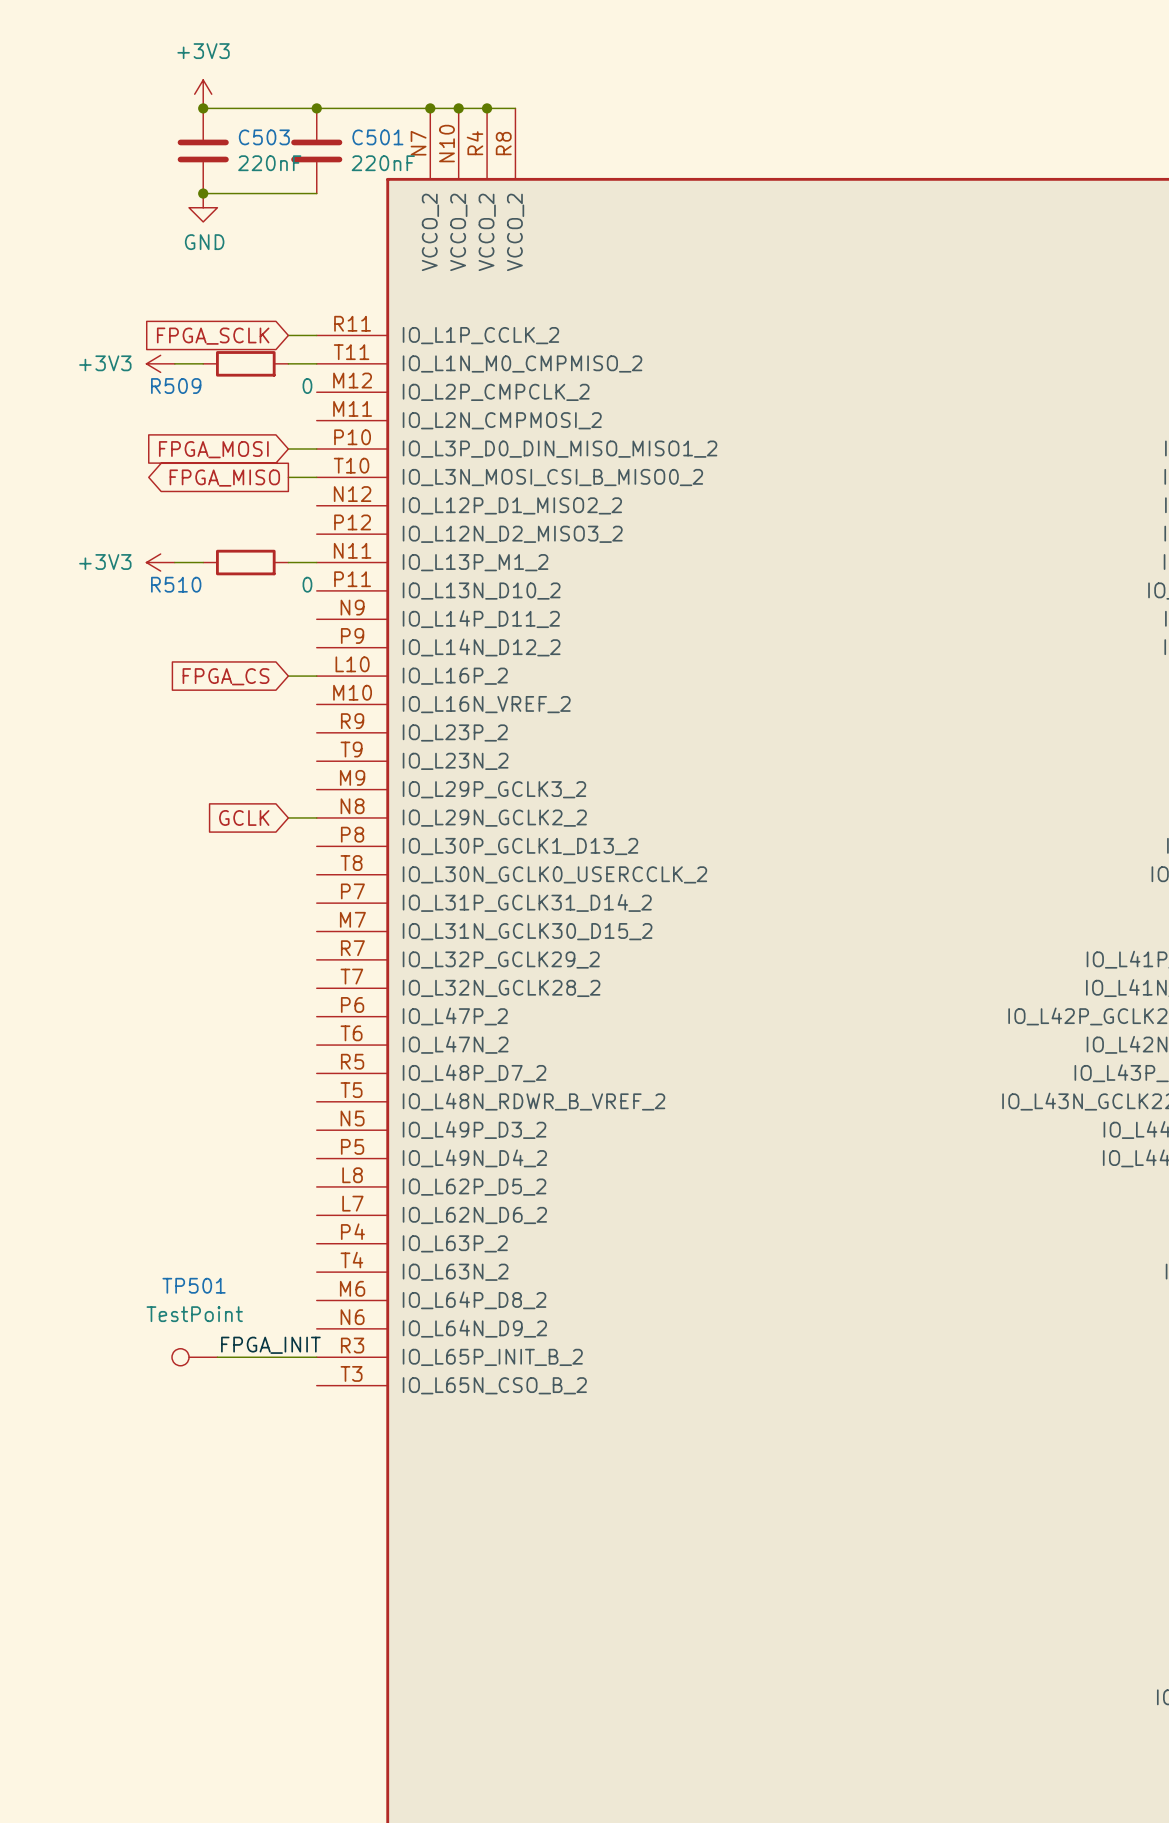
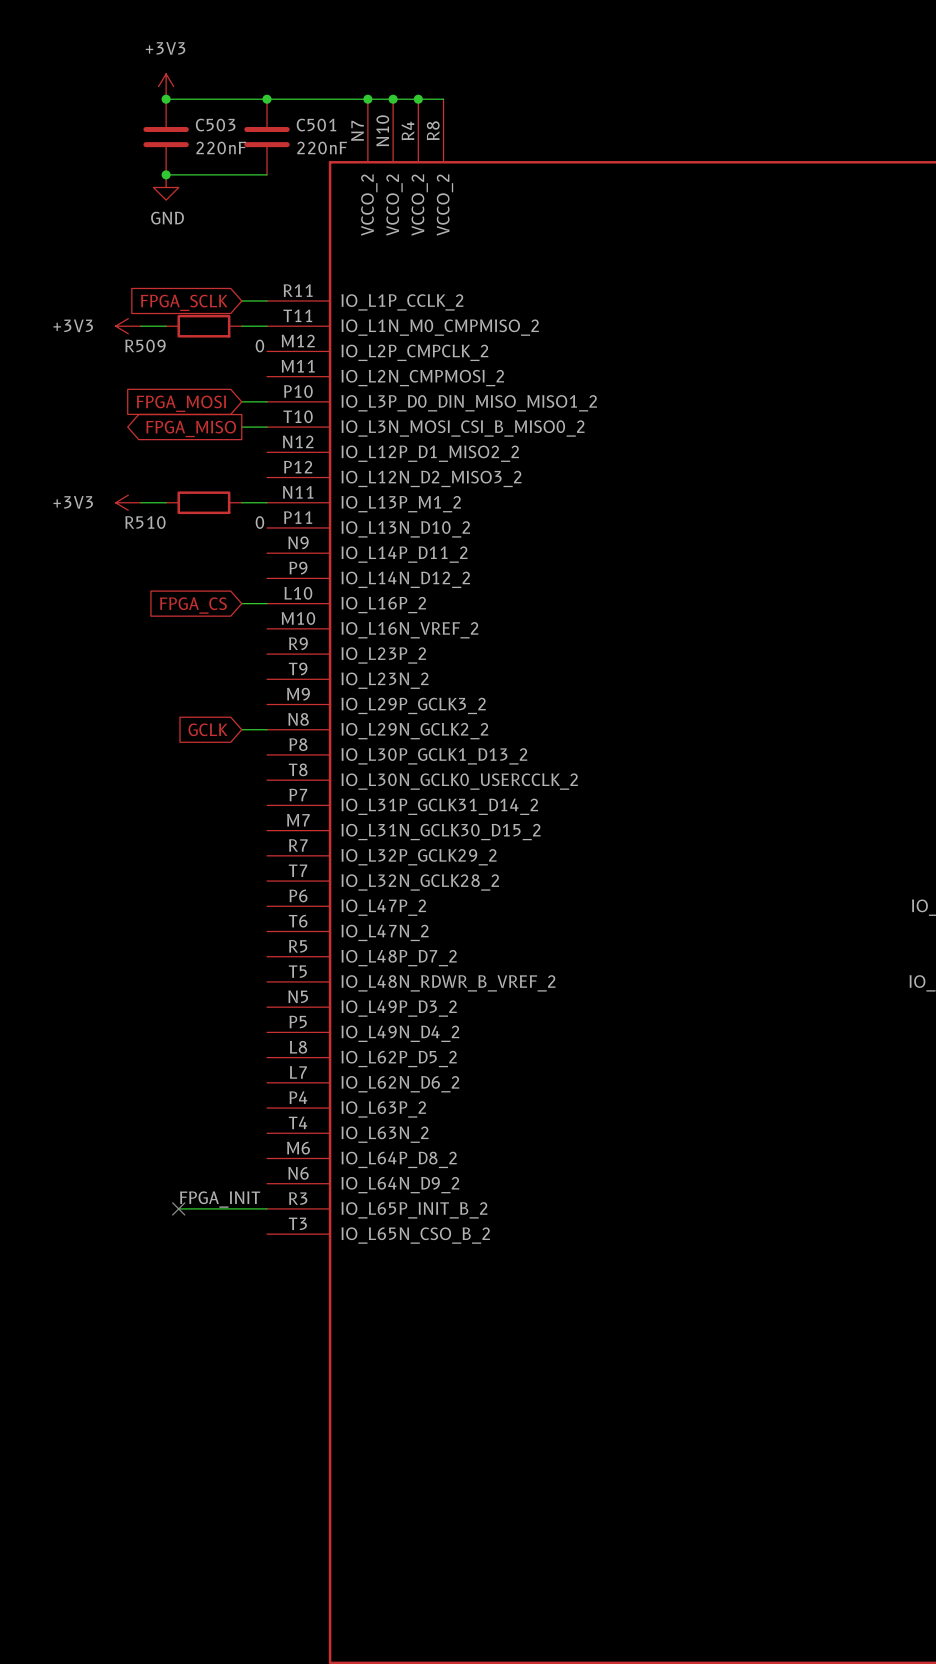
TP501: TestPoint (194, 1357) -> none
no-connect mark: none -> (178, 1208)

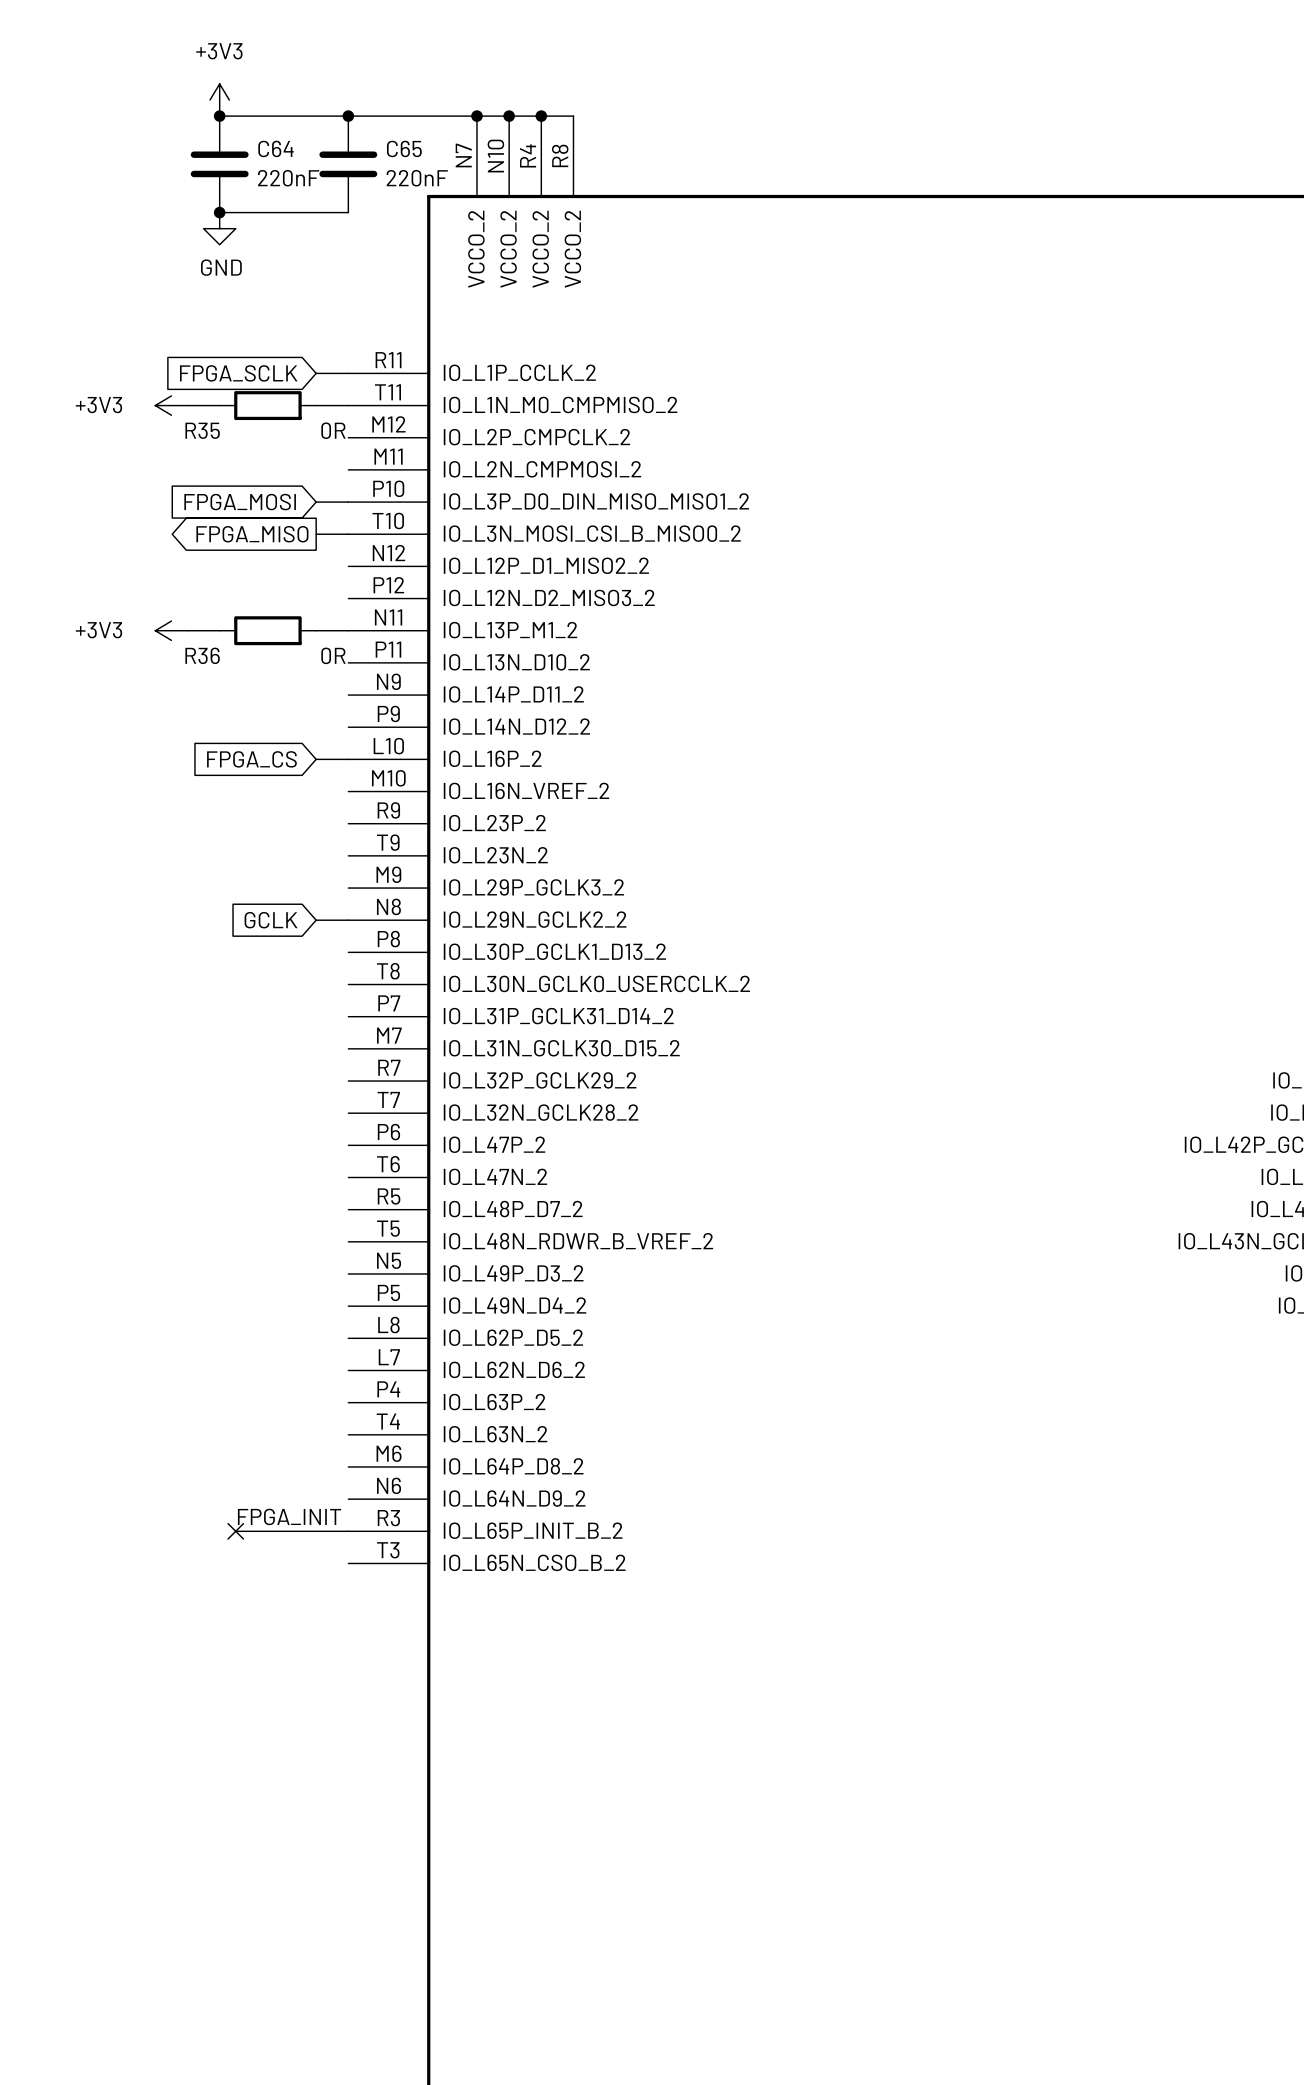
C503 name: C503 (215, 125) -> C64 (276, 148)
C501 name: C501 (316, 125) -> C65 (404, 148)
R509 name: R509 (145, 345) -> R35 (202, 430)
R509 value: 0 (259, 345) -> 0R (333, 430)
R510 name: R510 (145, 522) -> R36 (202, 655)
R510 value: 0 (259, 522) -> 0R (333, 655)

